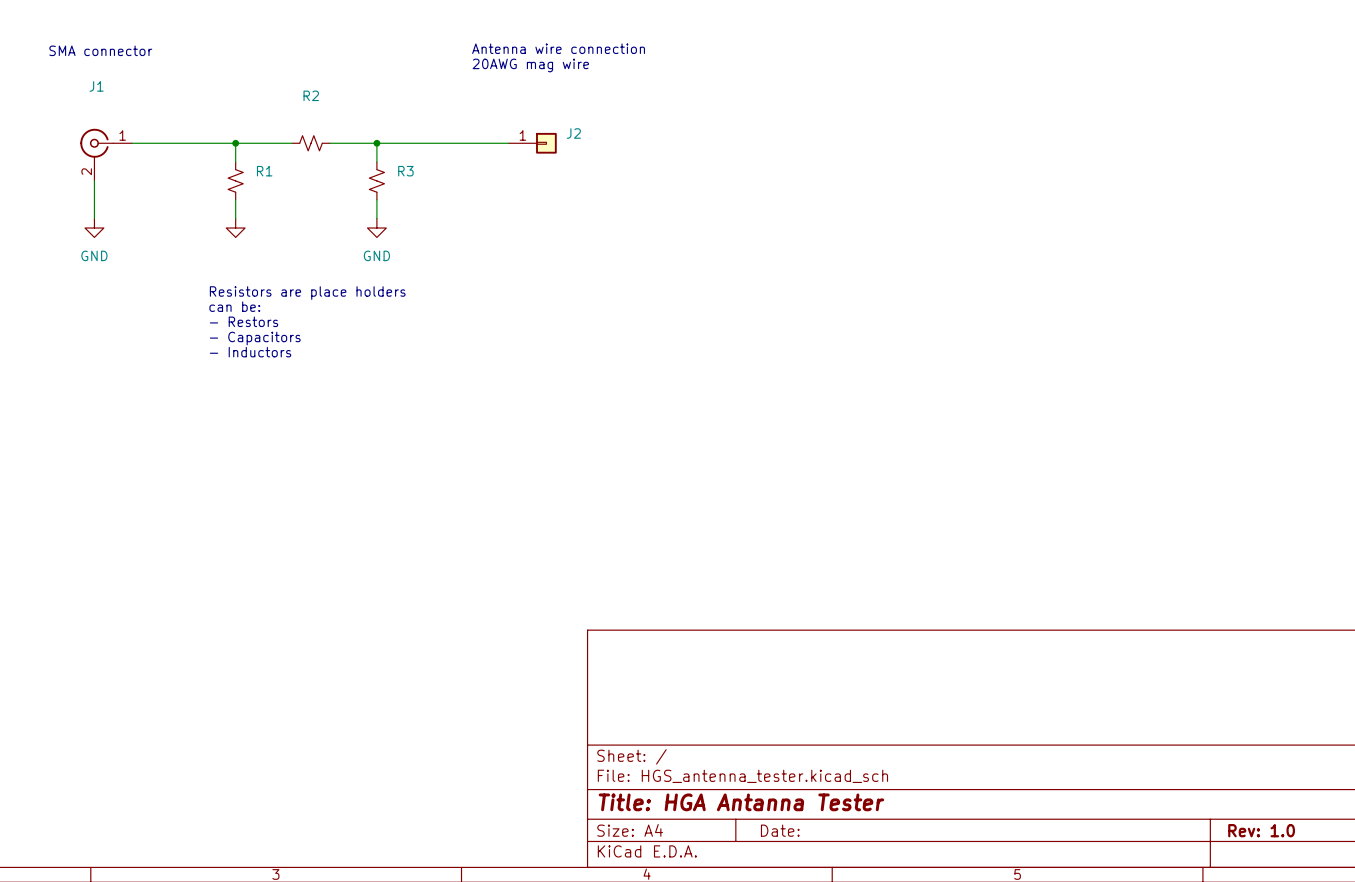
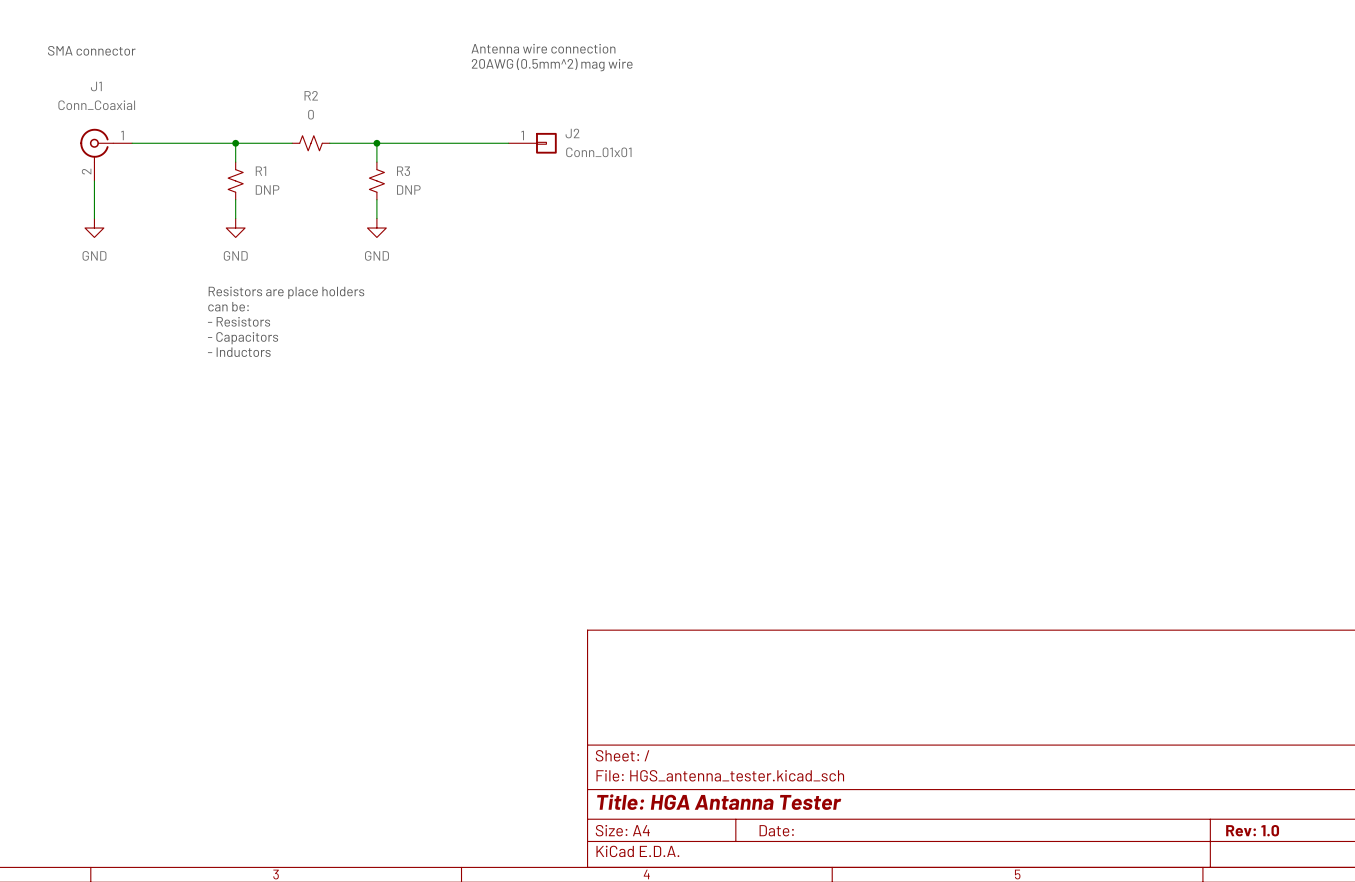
text: 20AWG mag wire (530, 65) -> 20AWG (0.5mm^2) mag wire (552, 64)
J1 value: none -> Conn_Coaxial (96, 105)
R2 value: none -> 0 (311, 114)
J2 value: none -> Conn_01x01 (598, 152)
R1 value: none -> DNP (267, 189)
R3 value: none -> DNP (408, 189)
power symbol text: none -> GND (235, 255)
text: - Restors (244, 321) -> - Resistors (239, 321)

